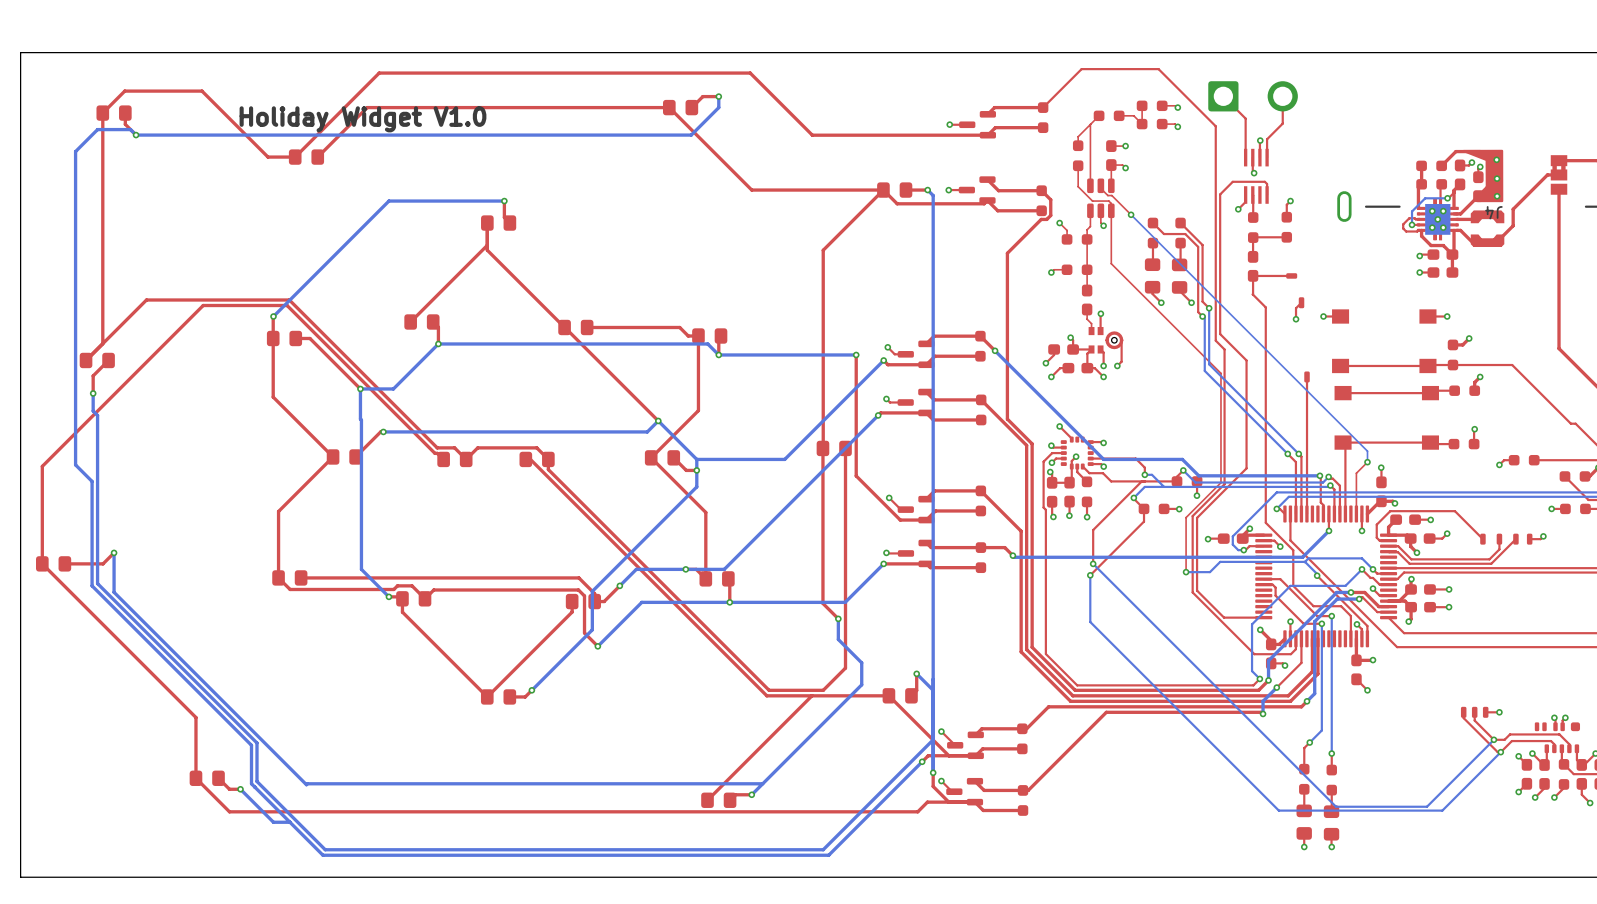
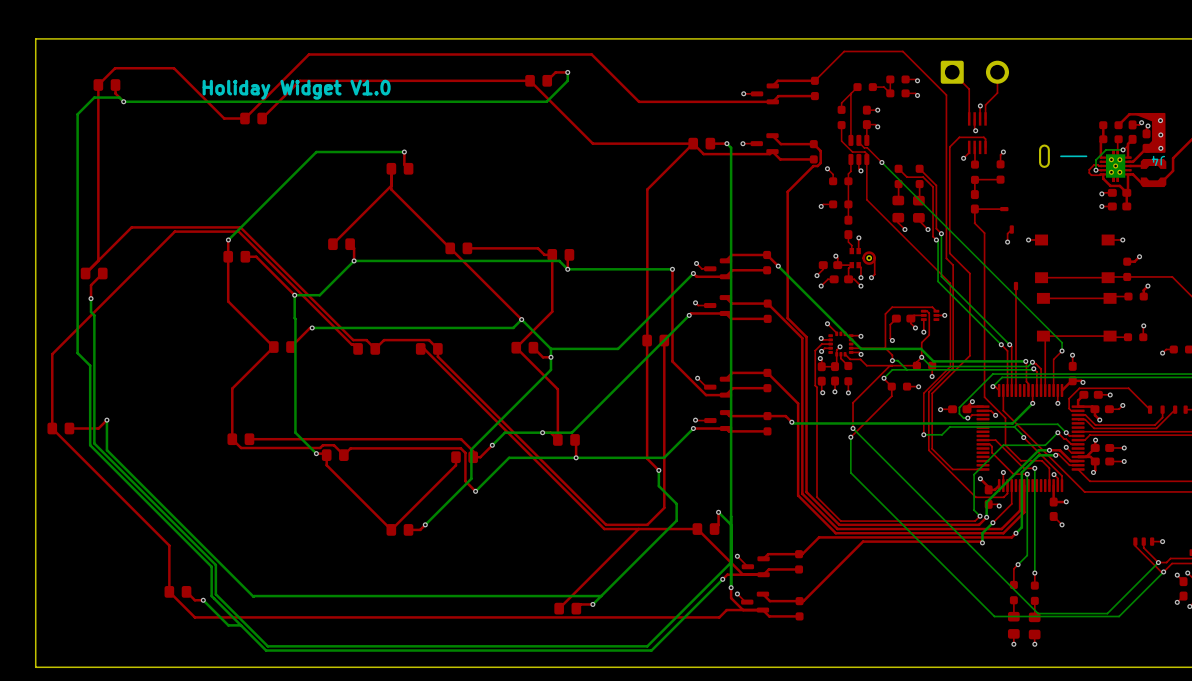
top track: none -> (923, 311) (929, 313) (929, 335) (921, 342) (921, 357)
top track: none -> (936, 311) (932, 307) (892, 307) (885, 313) (885, 348)
top track: none -> (923, 315) (914, 315) (910, 318) (910, 323) (915, 327)
part: none -> (930, 315)
top track: none -> (944, 315) (936, 315)
via: none -> (944, 315)
top track: none -> (896, 318) (890, 324) (890, 338) (892, 340)
part: none -> (903, 318)
top track: none -> (923, 319) (923, 332)
via: none -> (915, 327)
via: none -> (923, 332)
via: none -> (892, 340)

